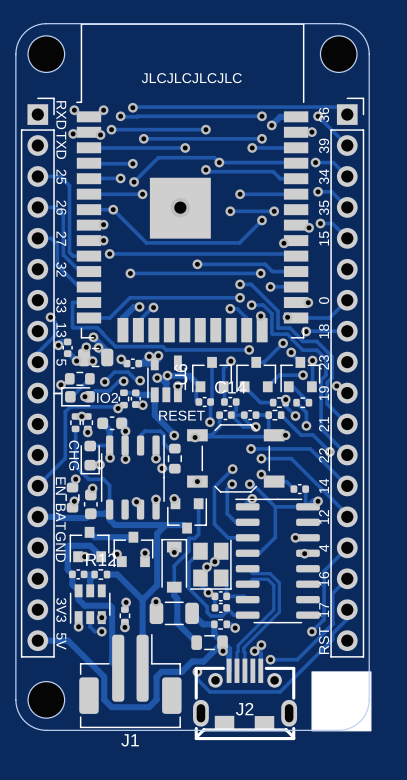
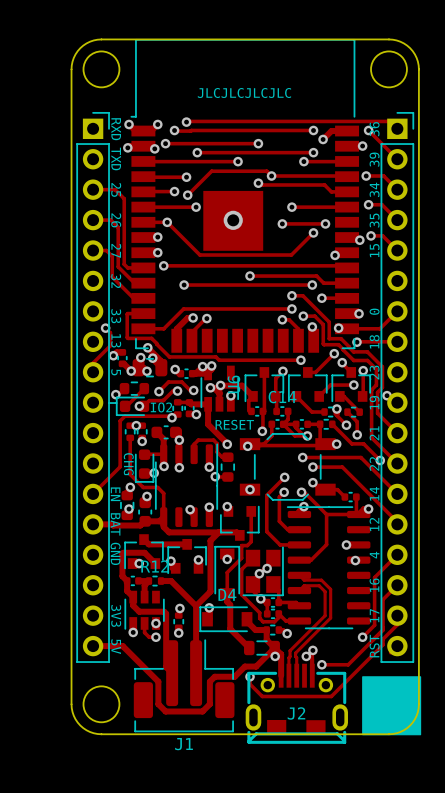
D4: none -> (225, 619)
part: (174, 613) -> none

